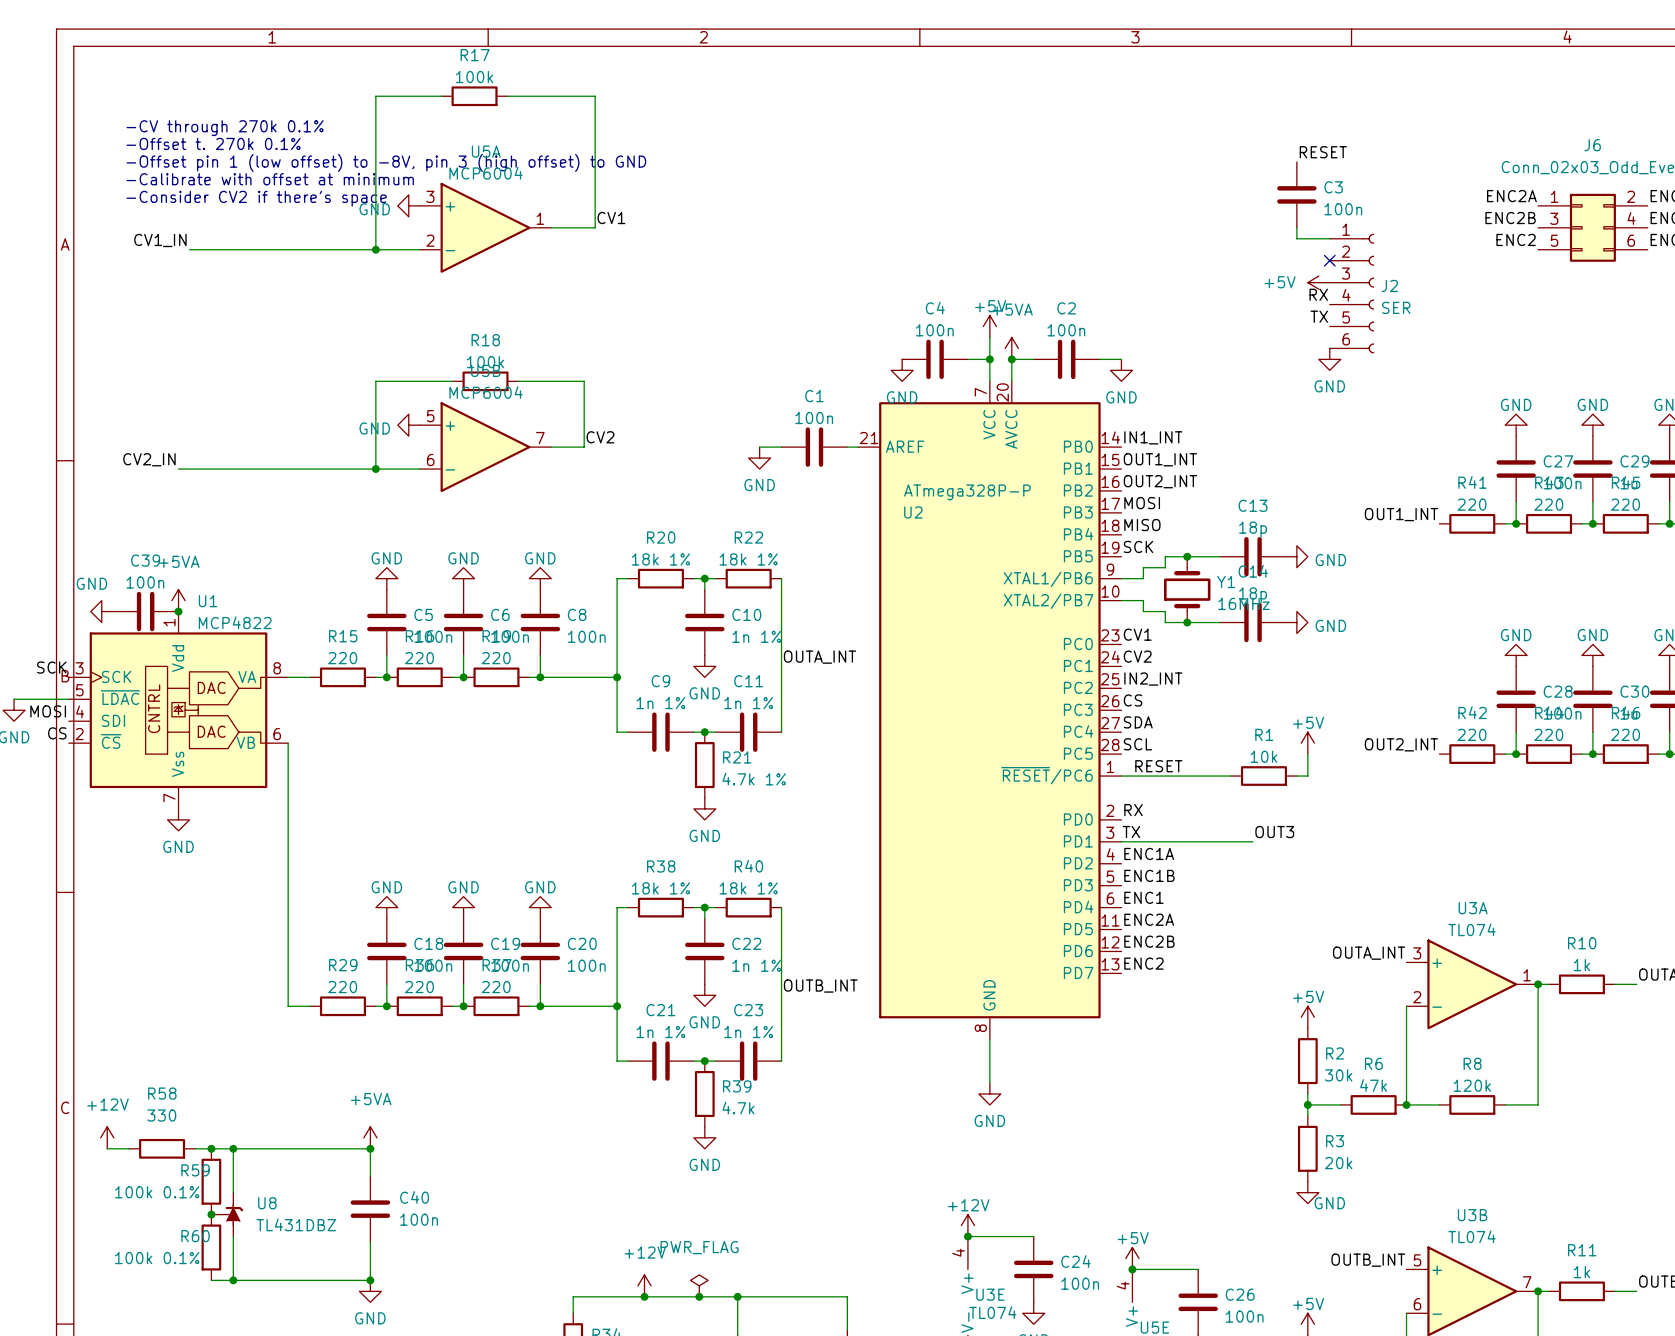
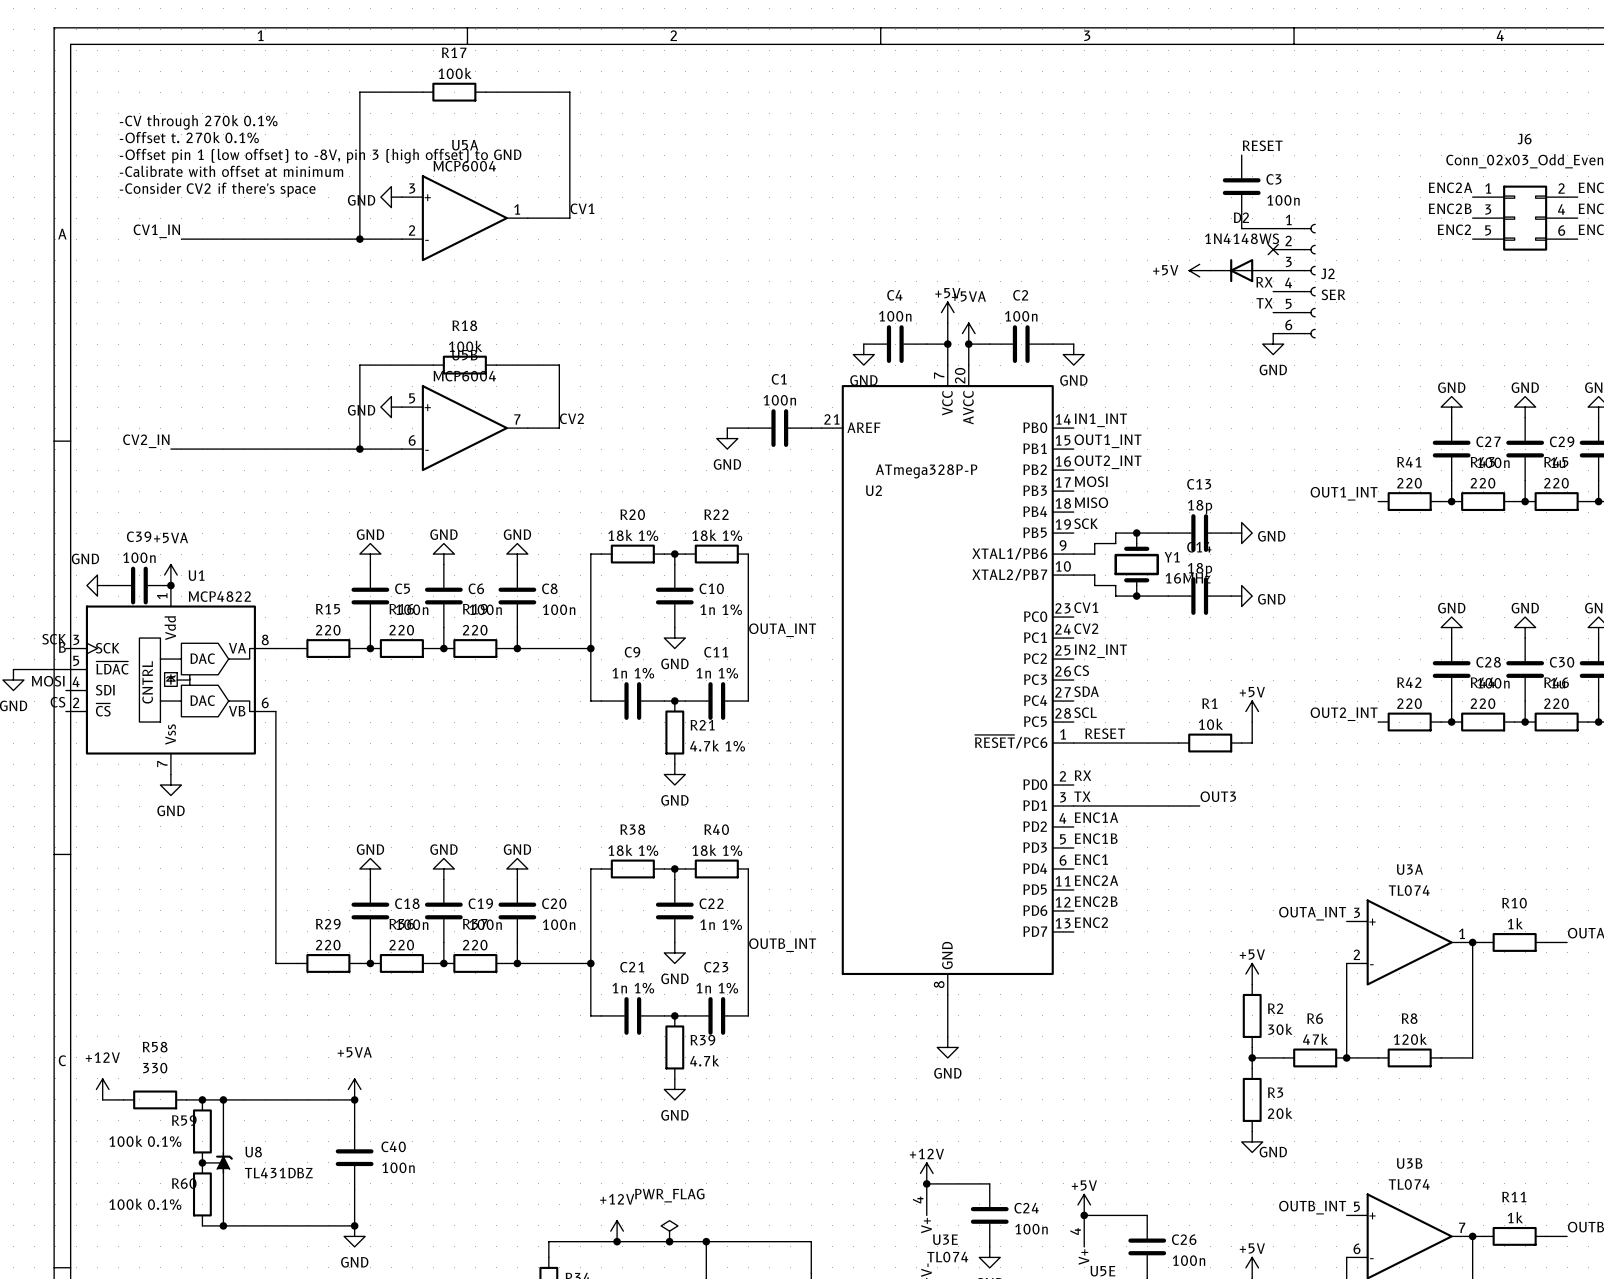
D2: none -> 1N4148WS (1241, 270)
power symbol position: +5V (1318, 282) -> +5V (1199, 270)

